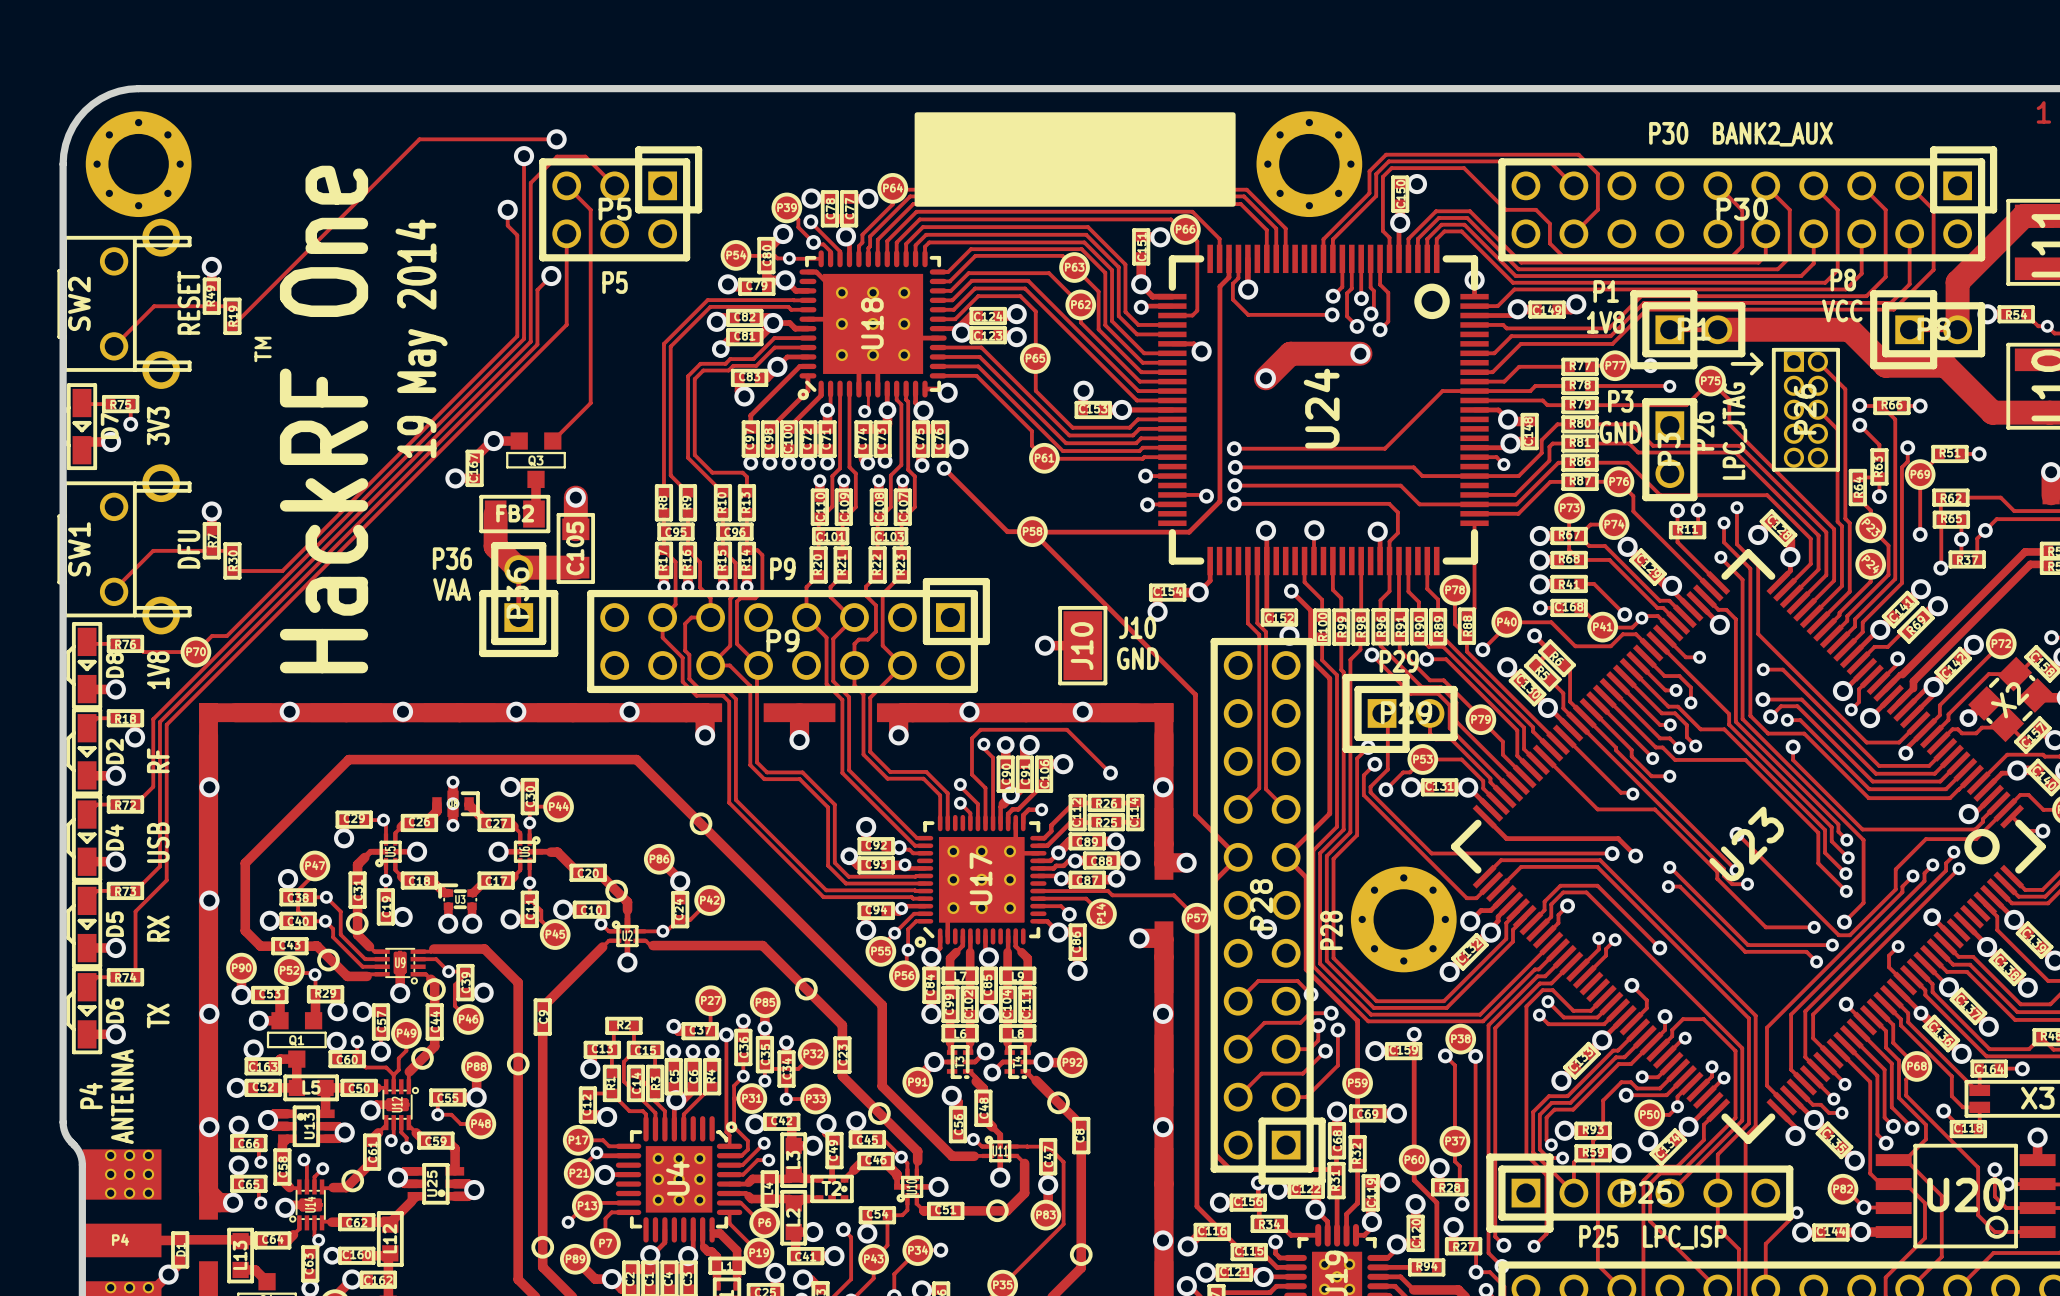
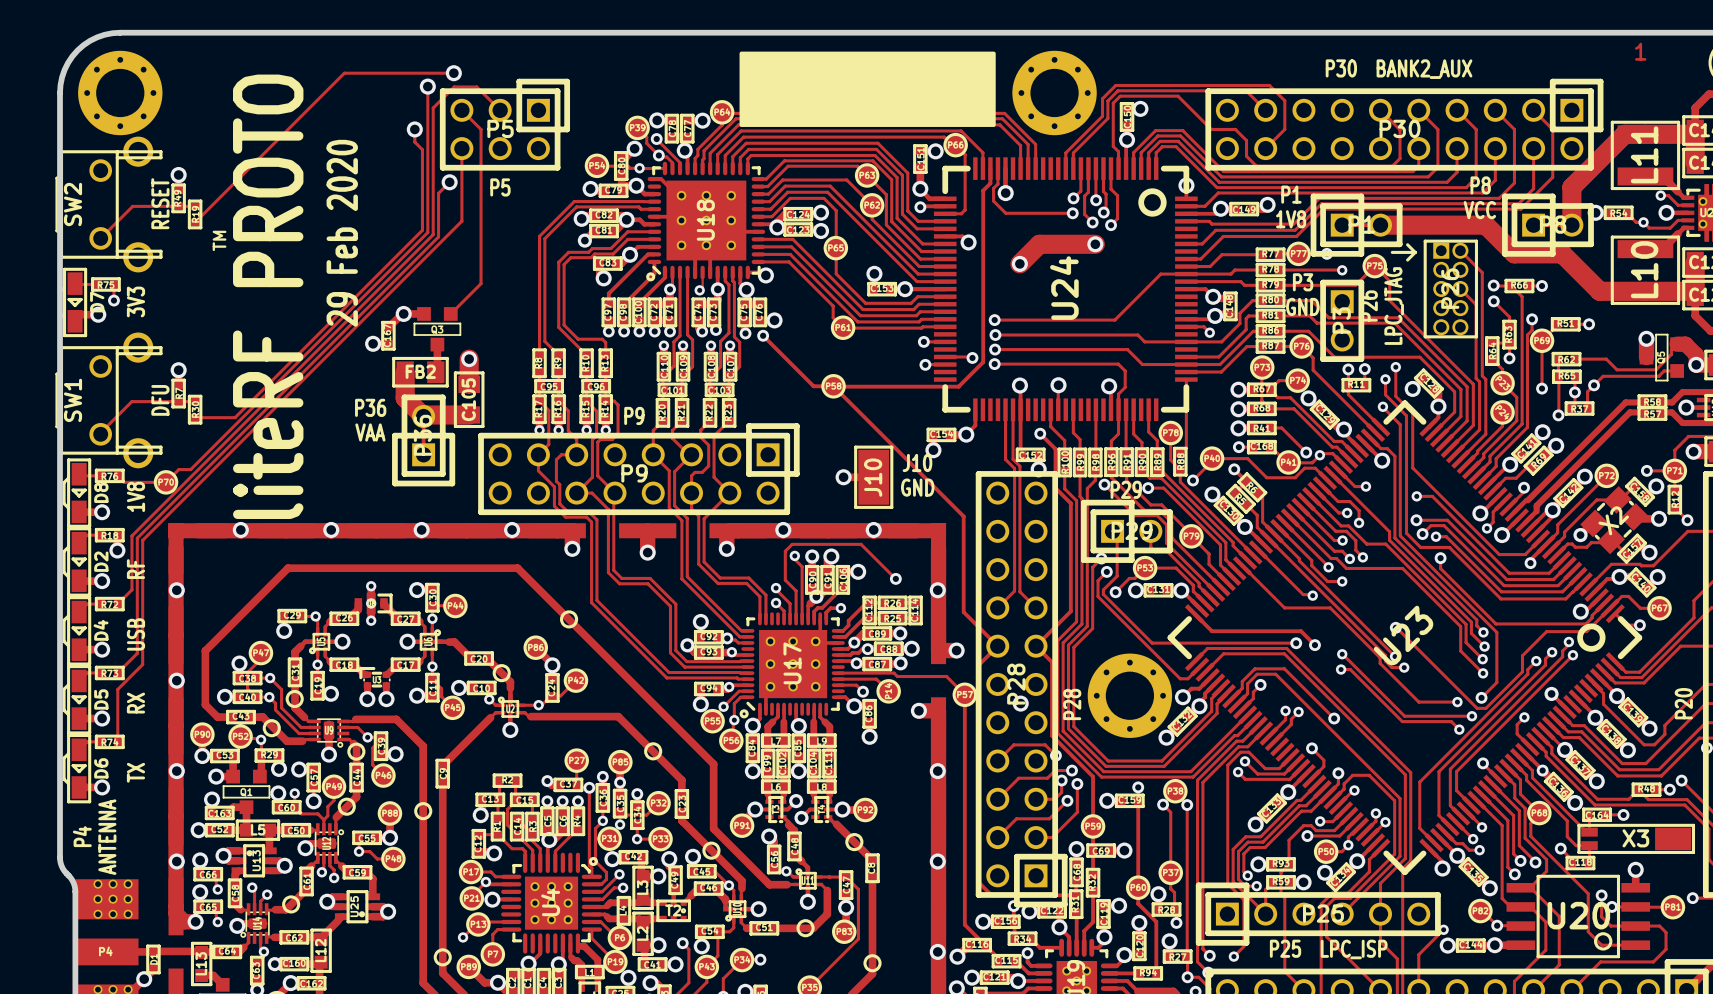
text: 19 May 2014 (421, 338) -> 29 Feb 2020 (342, 233)
text: HackRF One (324, 419) -> liteRF PROTO (268, 296)

